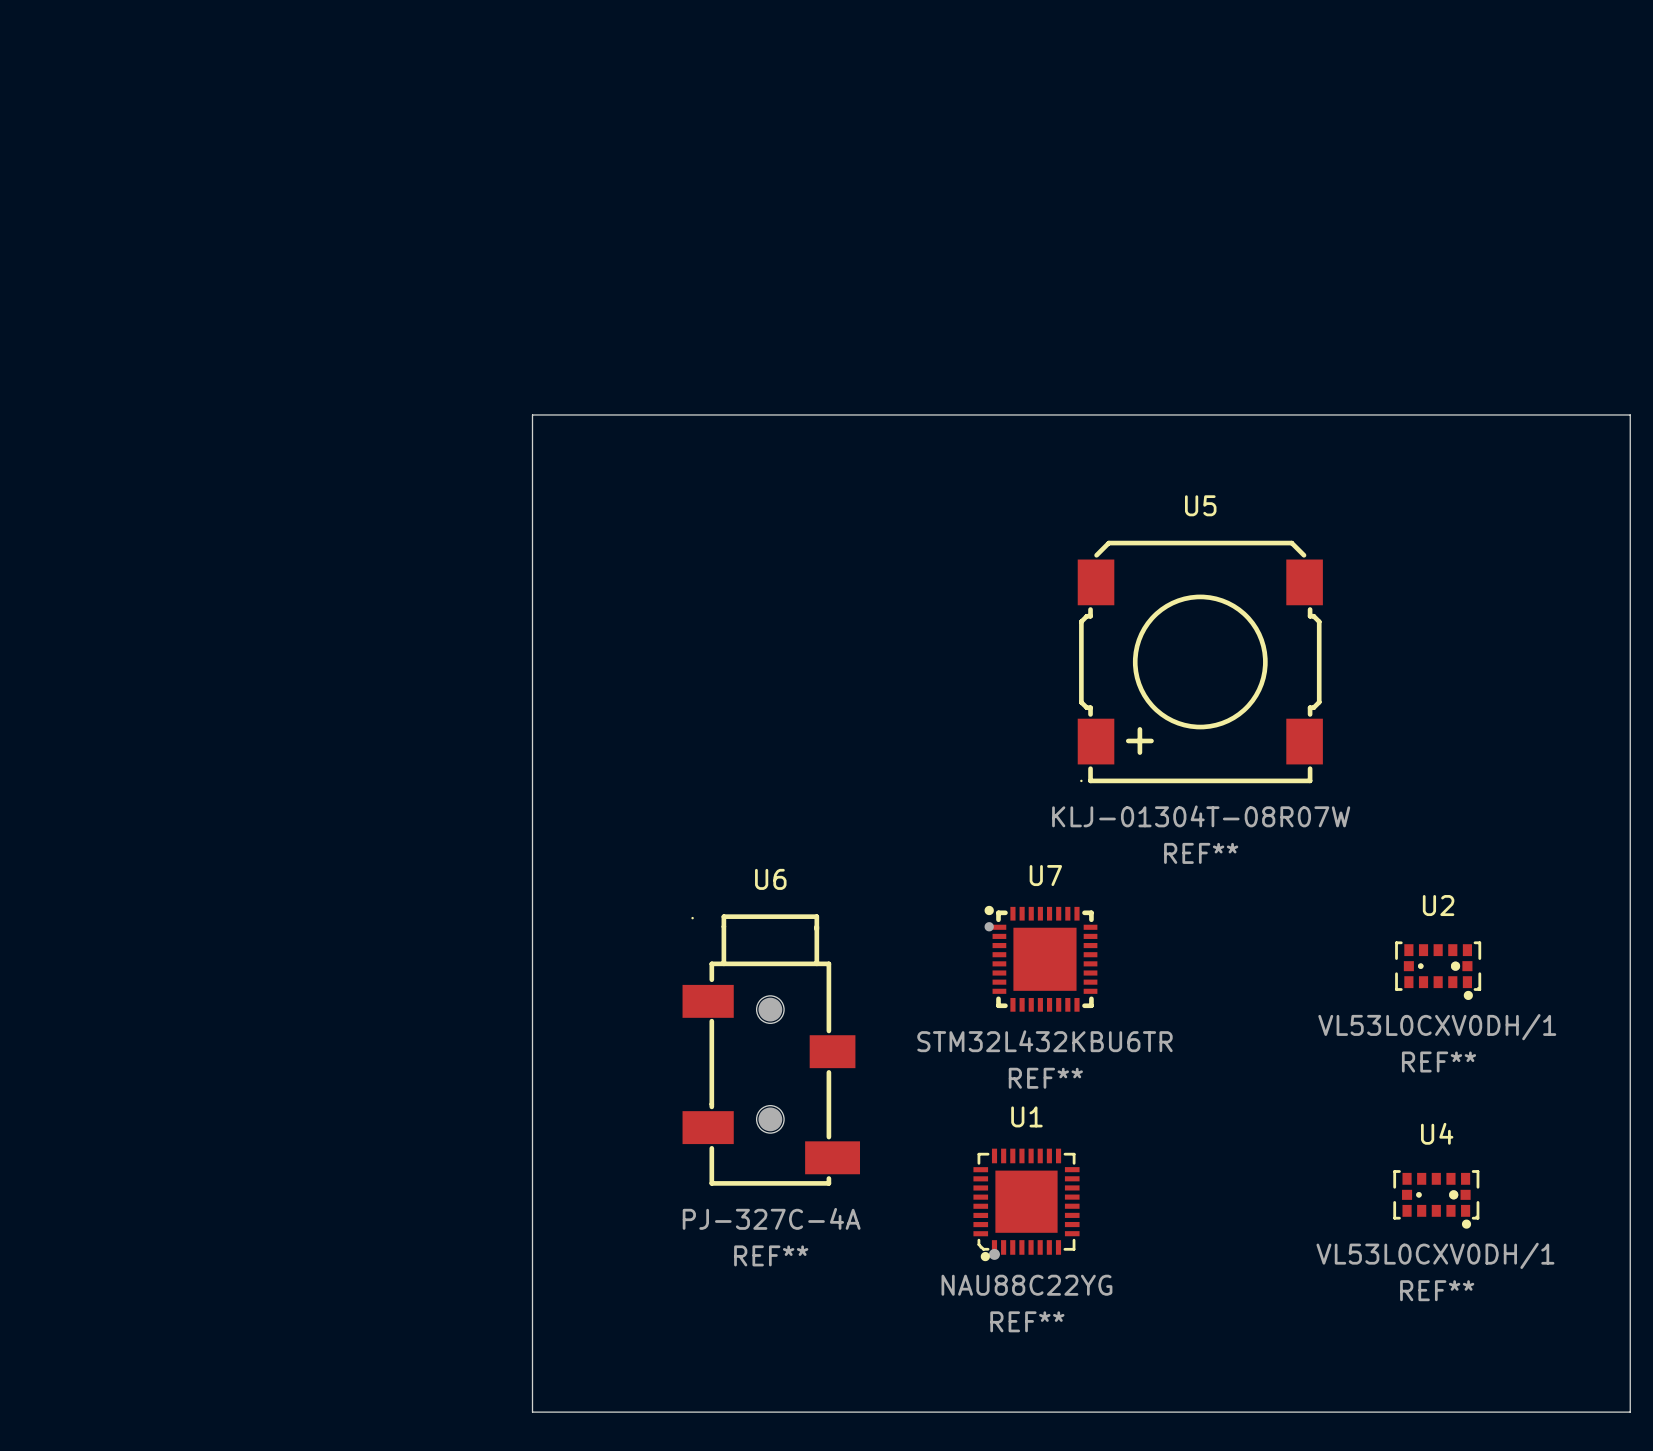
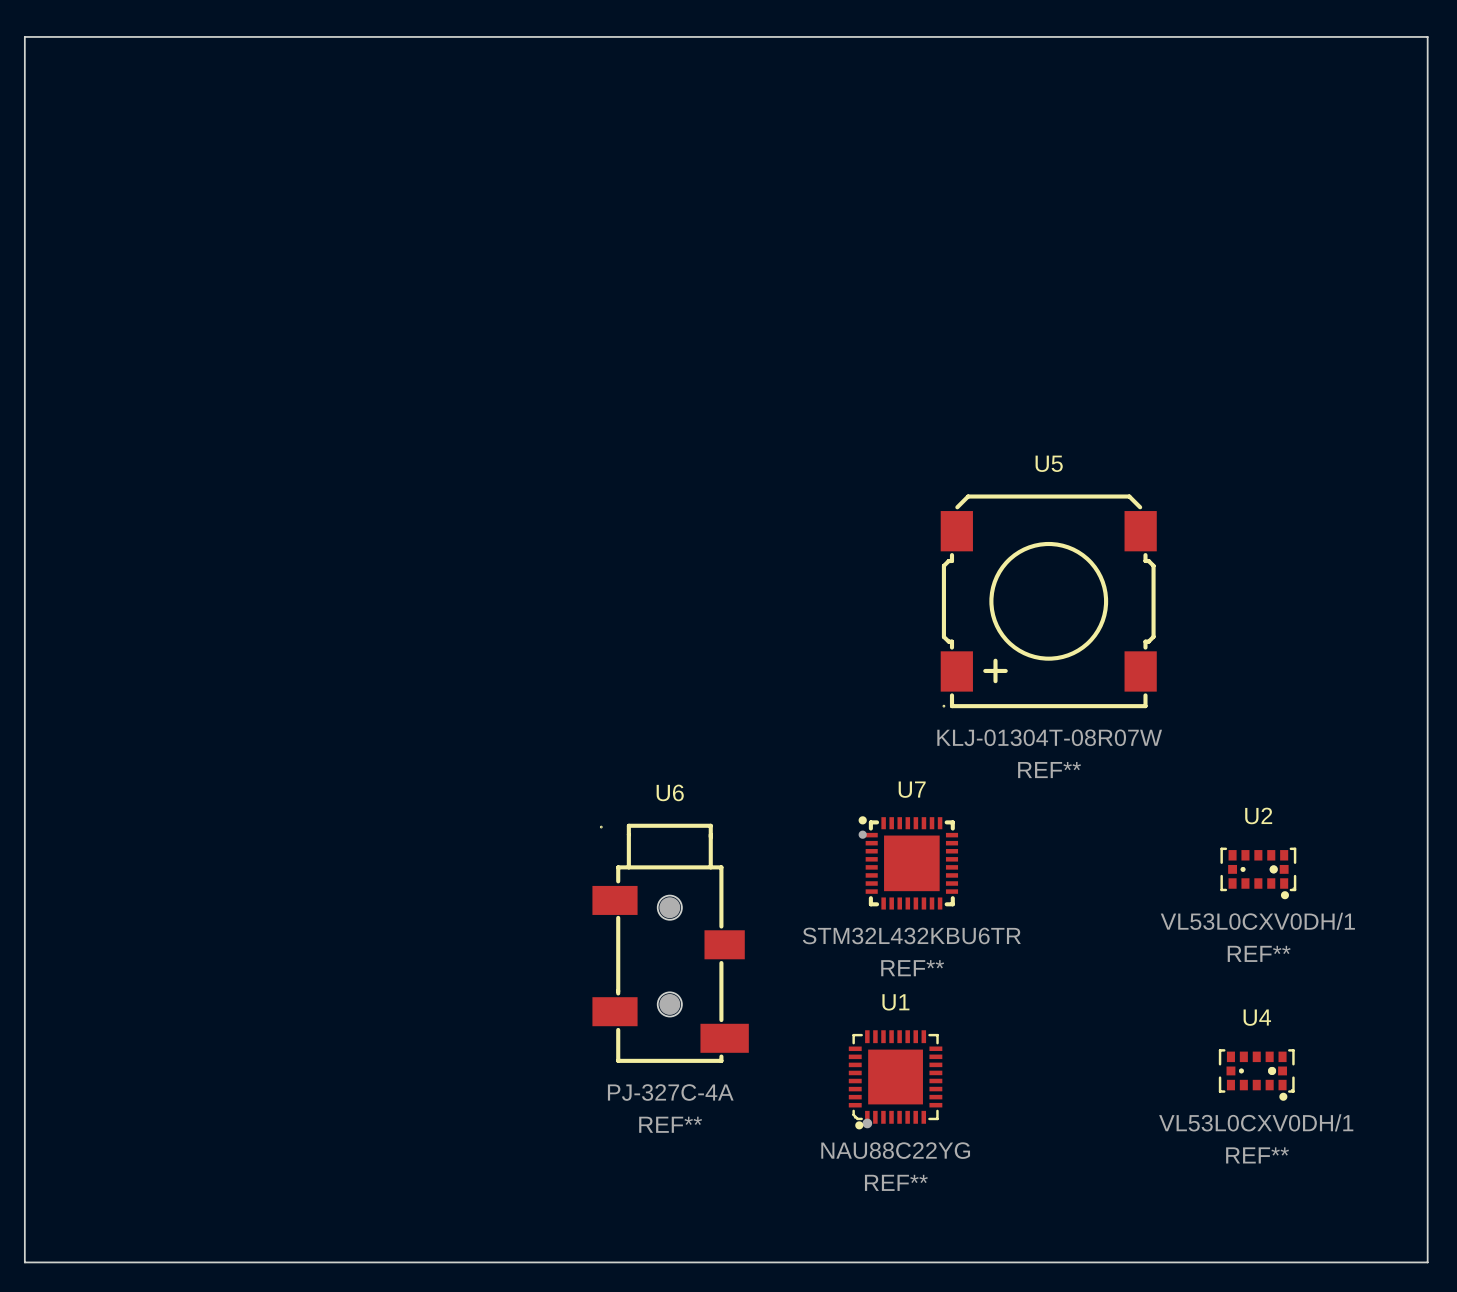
board edge: (1630, 414) (532, 414) (532, 1412) -> (1427, 383) (1427, 36) (24, 36) (24, 1262) (460, 1262)

